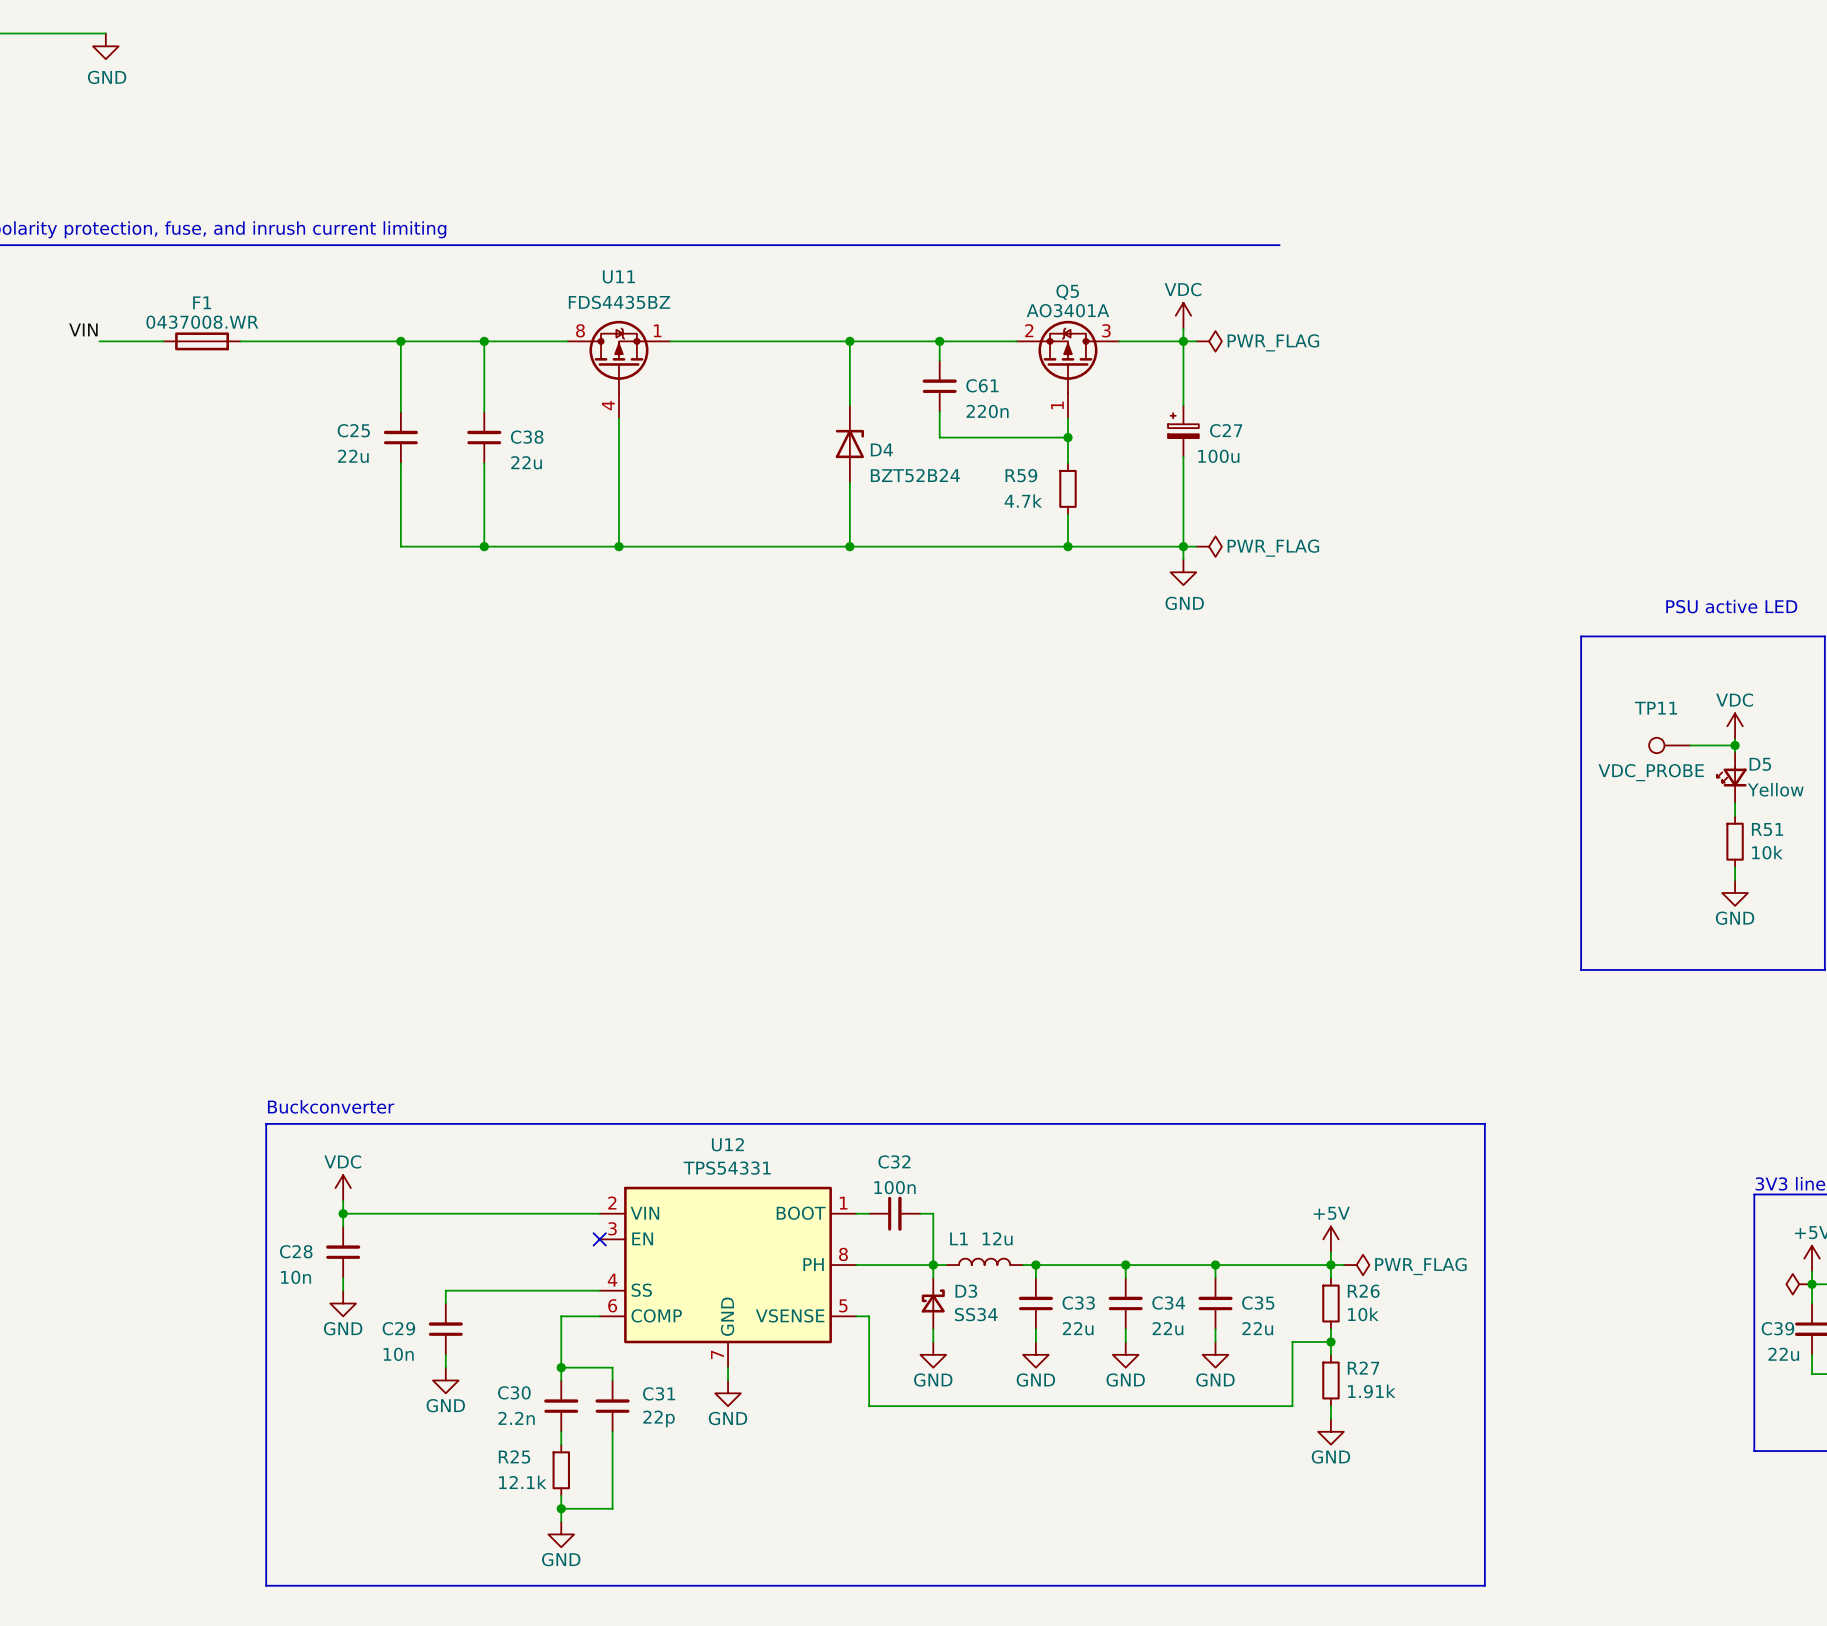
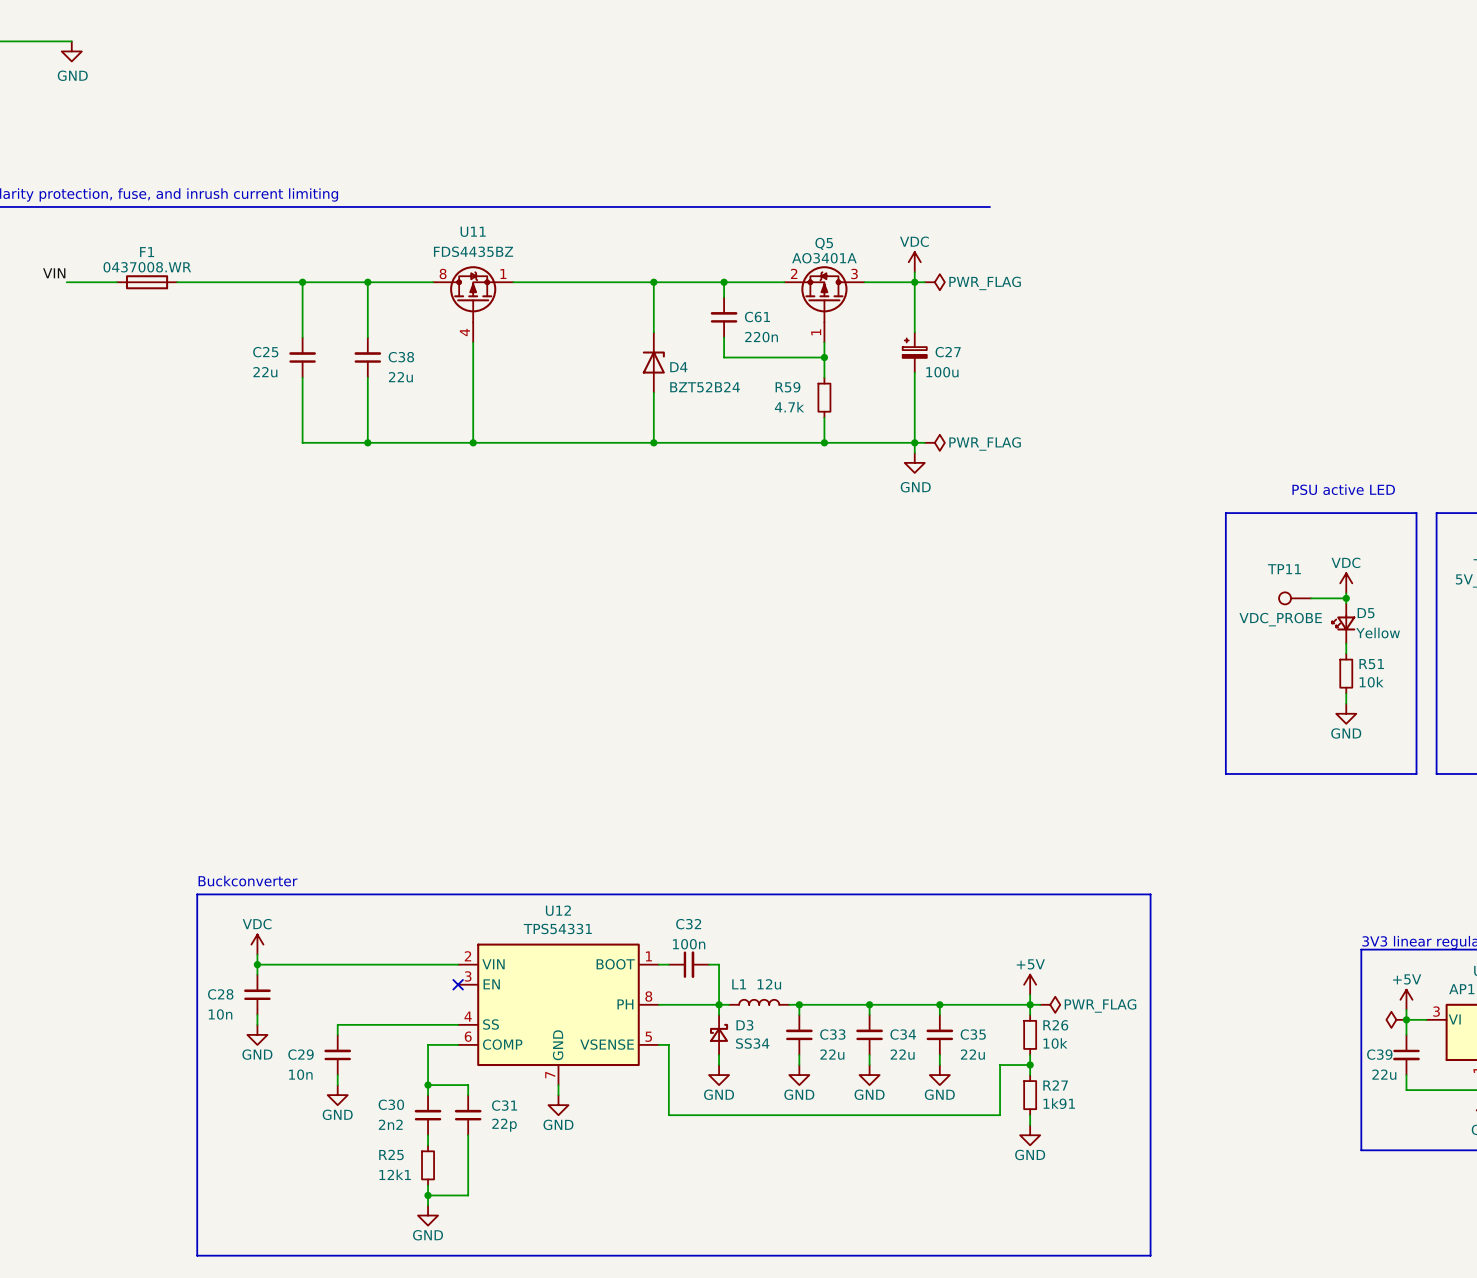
R27 value: 1.91k (1371, 1391) -> 1k91 (1059, 1103)
C30 value: 2.2n (516, 1418) -> 2n2 (390, 1124)
R25 value: 12.1k (522, 1482) -> 12k1 (395, 1174)

